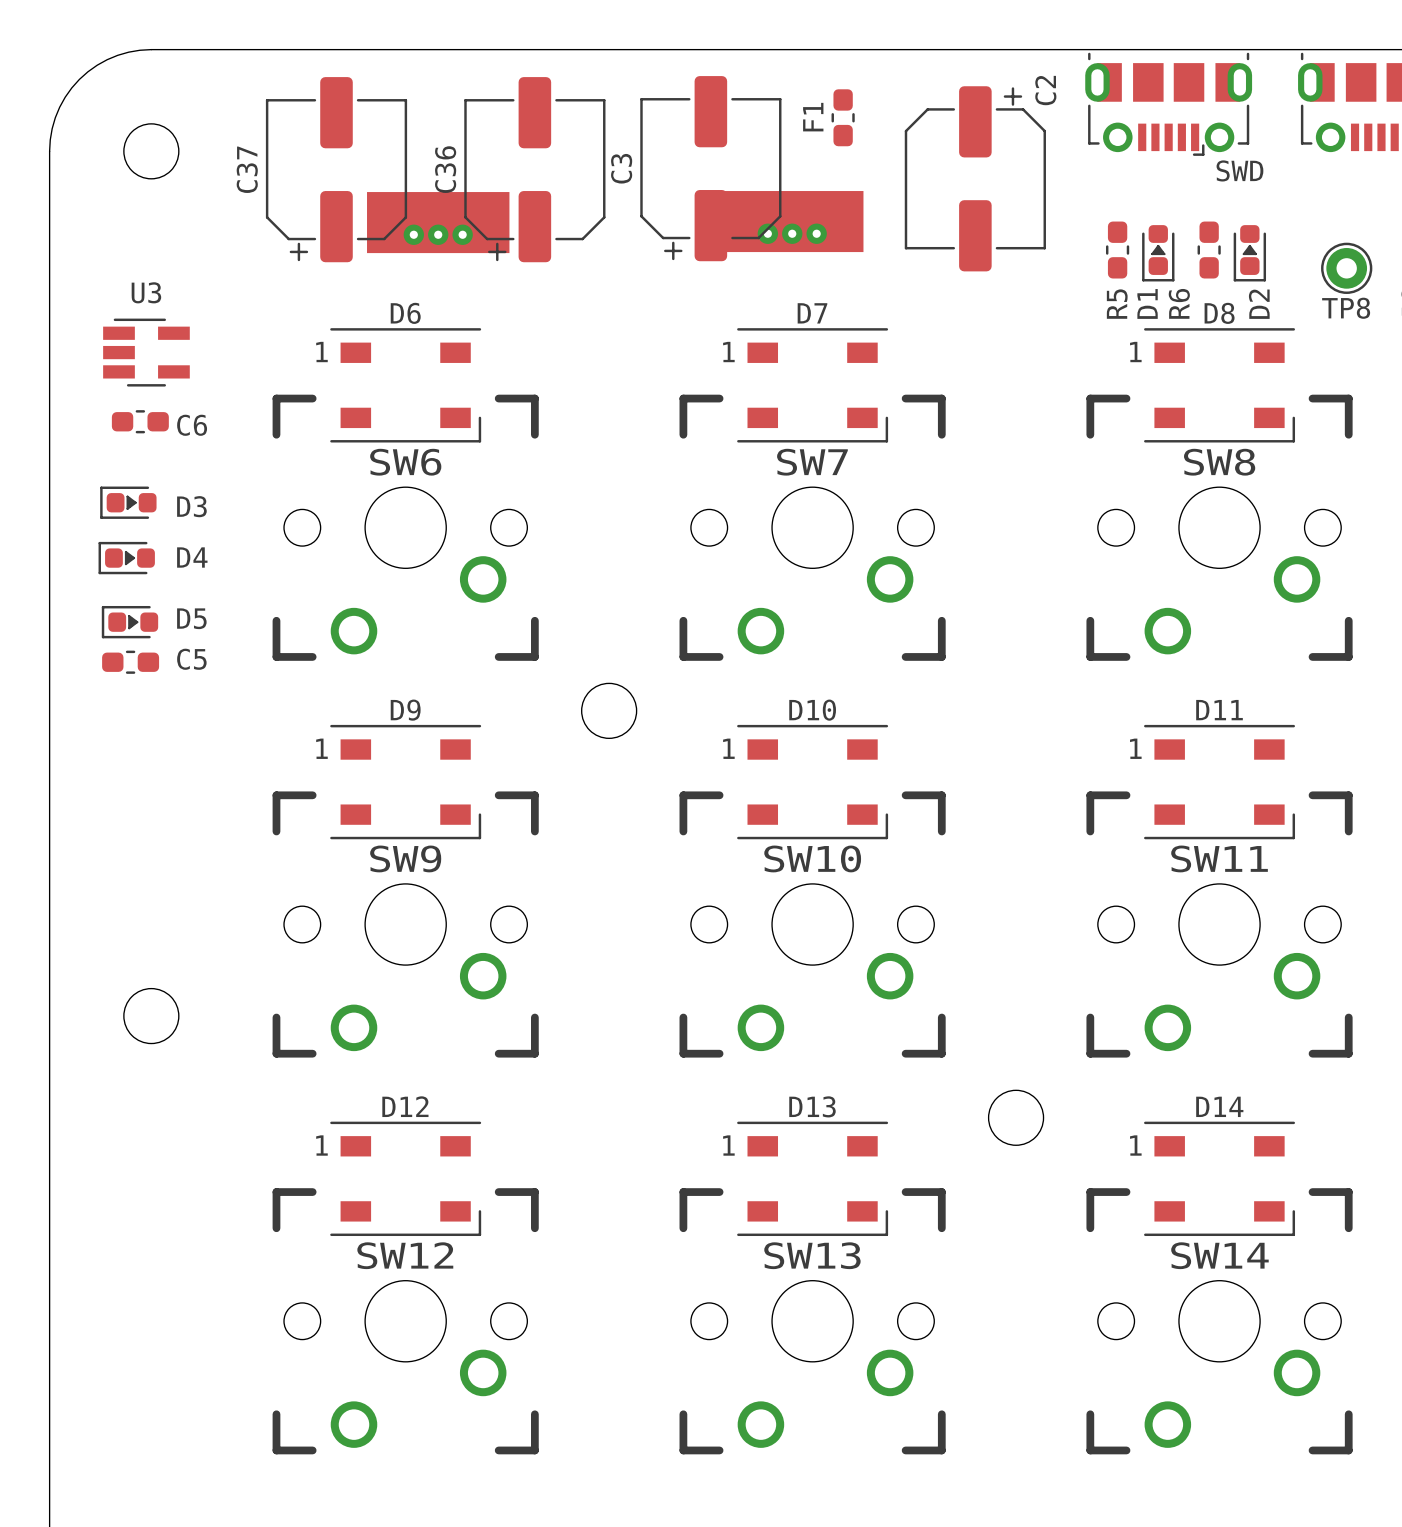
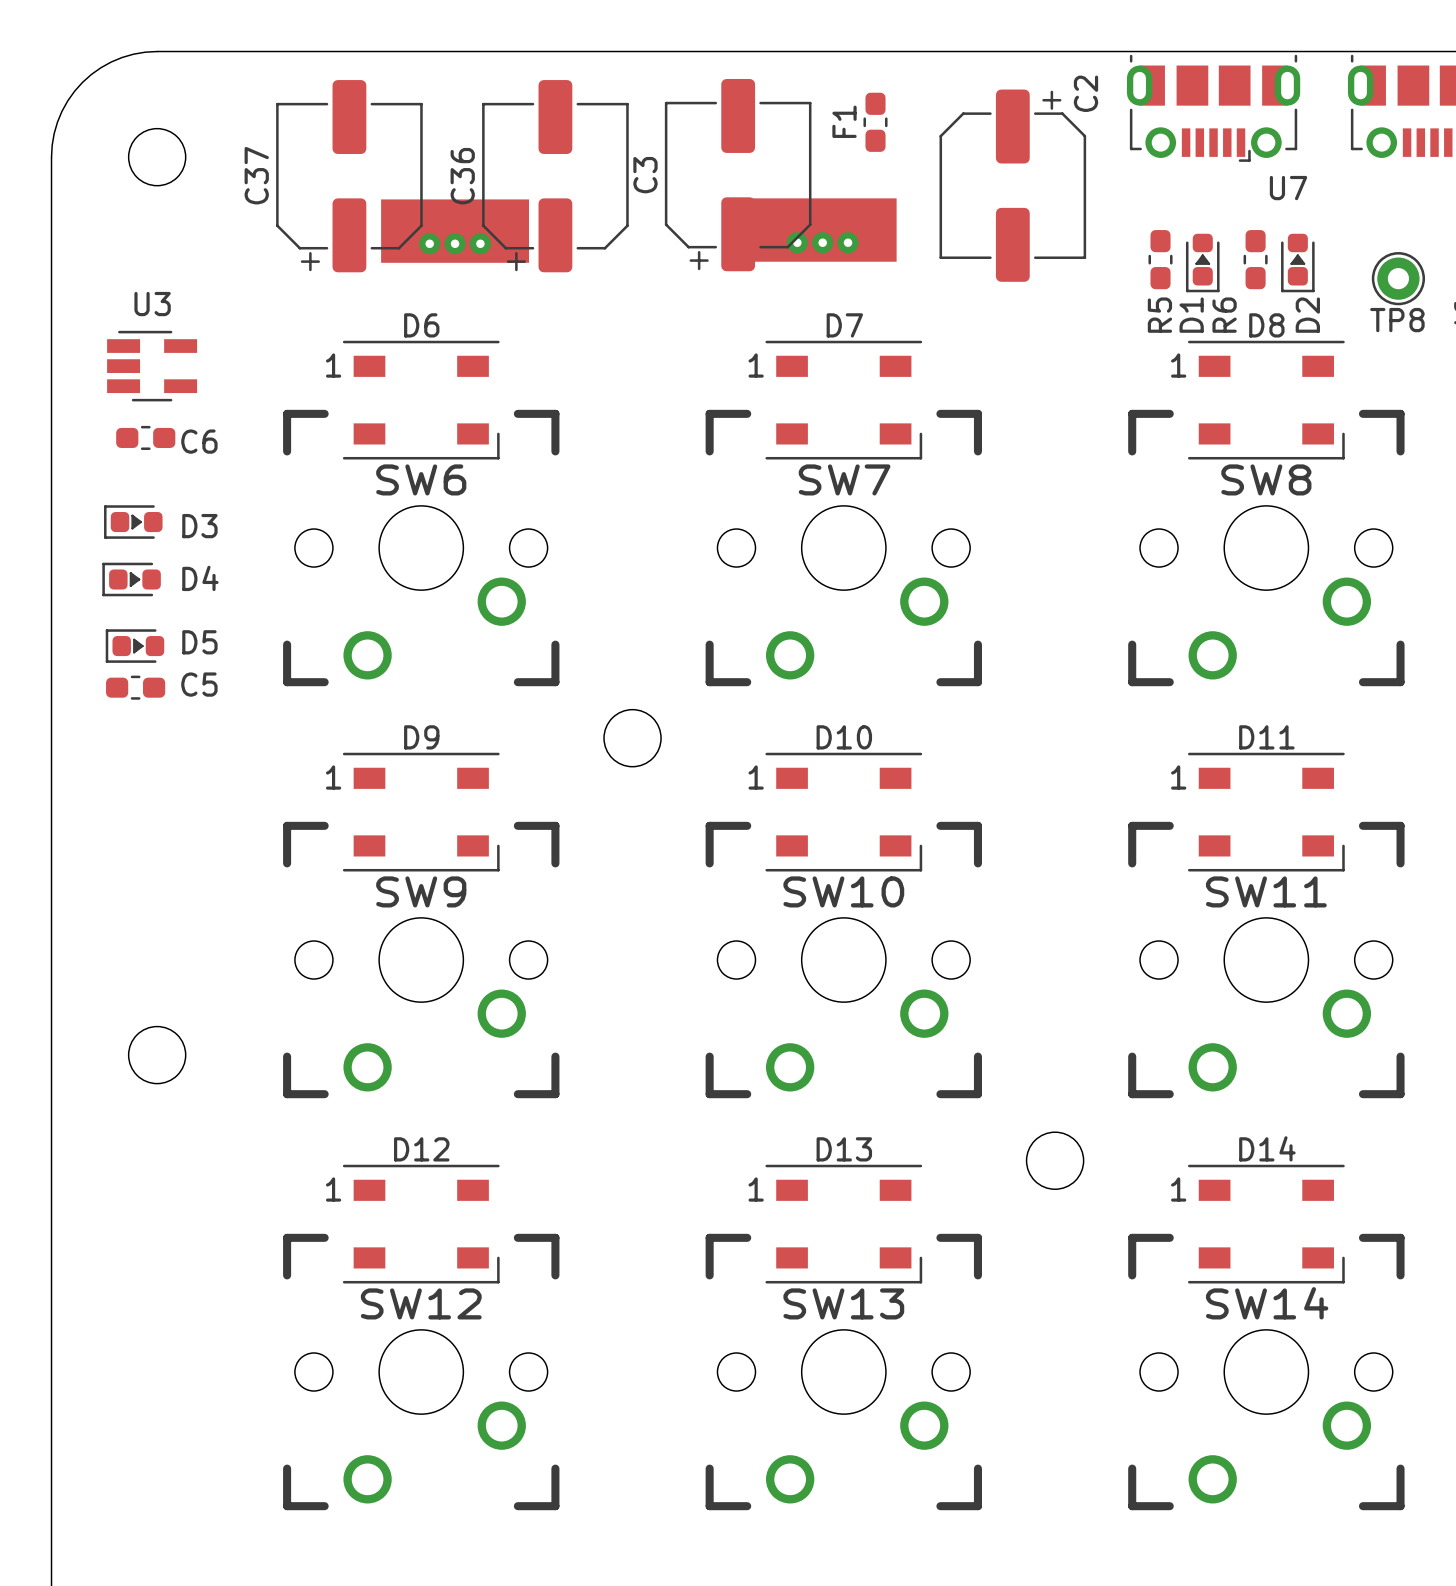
U7 value: SWD (1239, 170) -> none
U7 name: none -> U7 (1288, 188)

